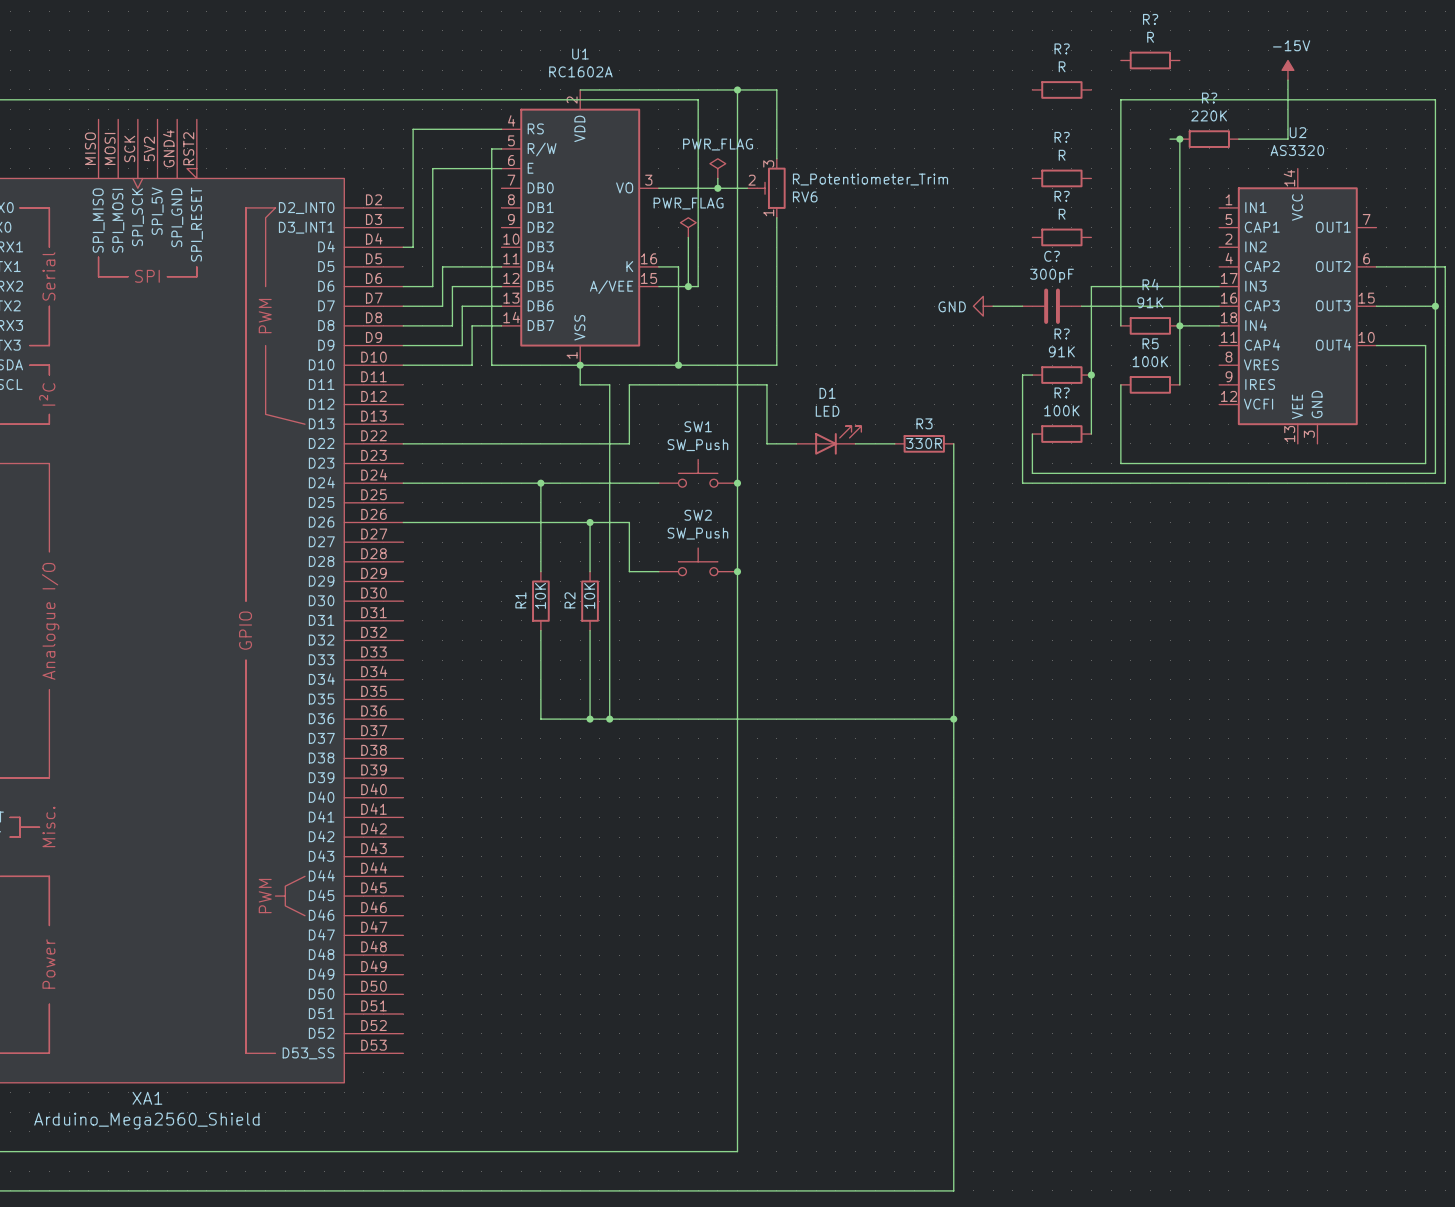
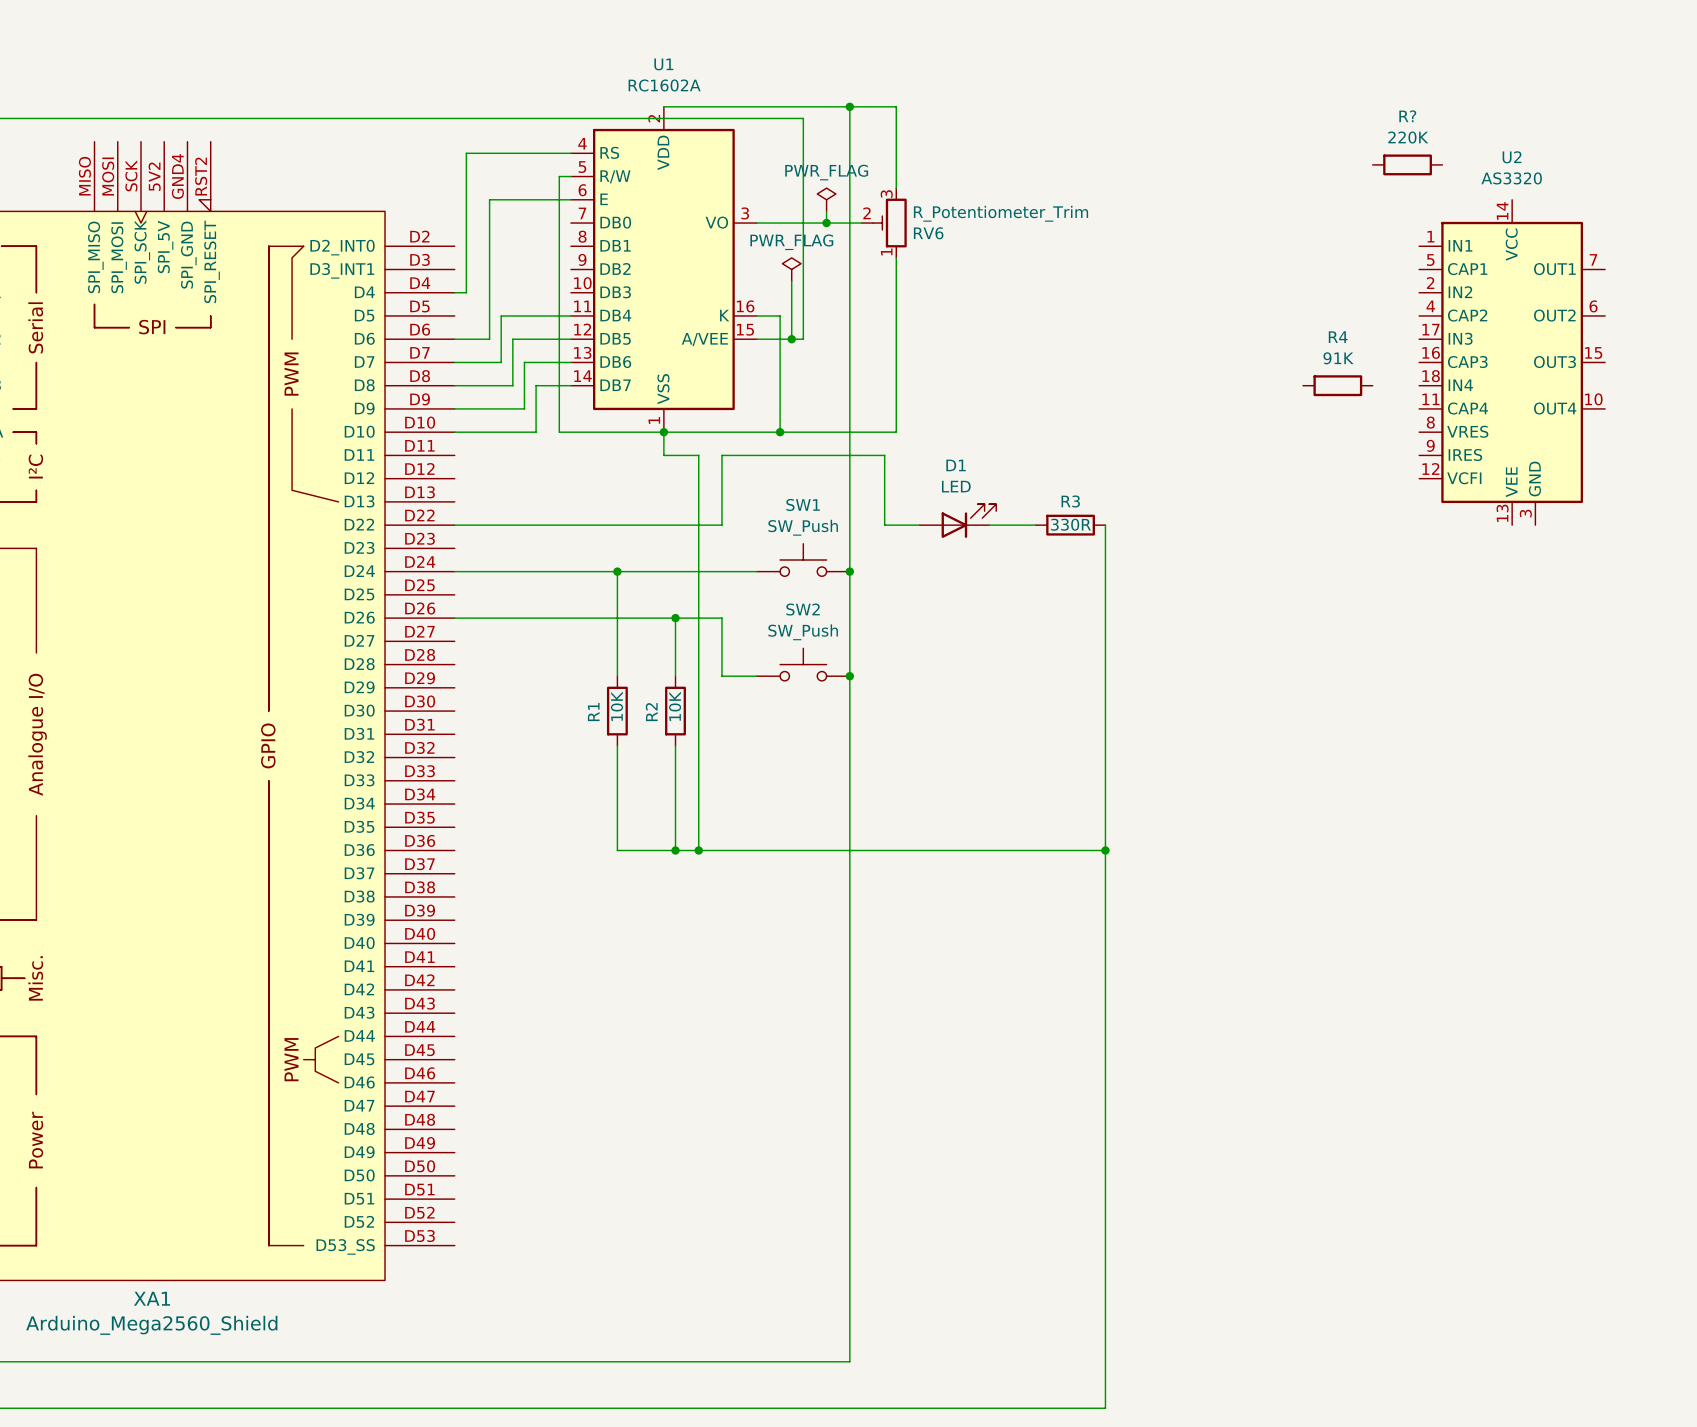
R?: R (1150, 60) -> none
power symbol: -15V (1287, 70) -> none
wire: (1287, 80) (1287, 139) (1238, 139) -> none
R?: R (1061, 89) -> none
wire: (1170, 139) (1179, 139) (1179, 384) -> none
junction: (1179, 139) -> none
R?: R (1061, 178) -> none
R?: R (1061, 237) -> none
wire: (1376, 266) (1445, 266) (1445, 483) (1022, 483) (1022, 375) (1032, 375) -> none
wire: (1219, 286) (1091, 286) (1091, 434) -> none
power symbol: GND (983, 306) -> none
wire: (993, 306) (1022, 306) -> none
C?: 300pF (1052, 306) -> none
wire: (1081, 306) (1219, 306) -> none
wire: (1376, 306) (1435, 306) -> none
junction: (1435, 306) -> none
wire: (1120, 325) (1120, 99) (1435, 99) (1435, 473) (1032, 473) (1032, 434) -> none
wire: (1179, 325) (1219, 325) -> none
junction: (1179, 325) -> none
wire: (1376, 345) (1425, 345) (1425, 463) (1120, 463) (1120, 384) -> none
R?: 91K (1061, 375) -> none
junction: (1091, 375) -> none
R5: 100K (1150, 384) -> none
R?: 100K (1061, 434) -> none

